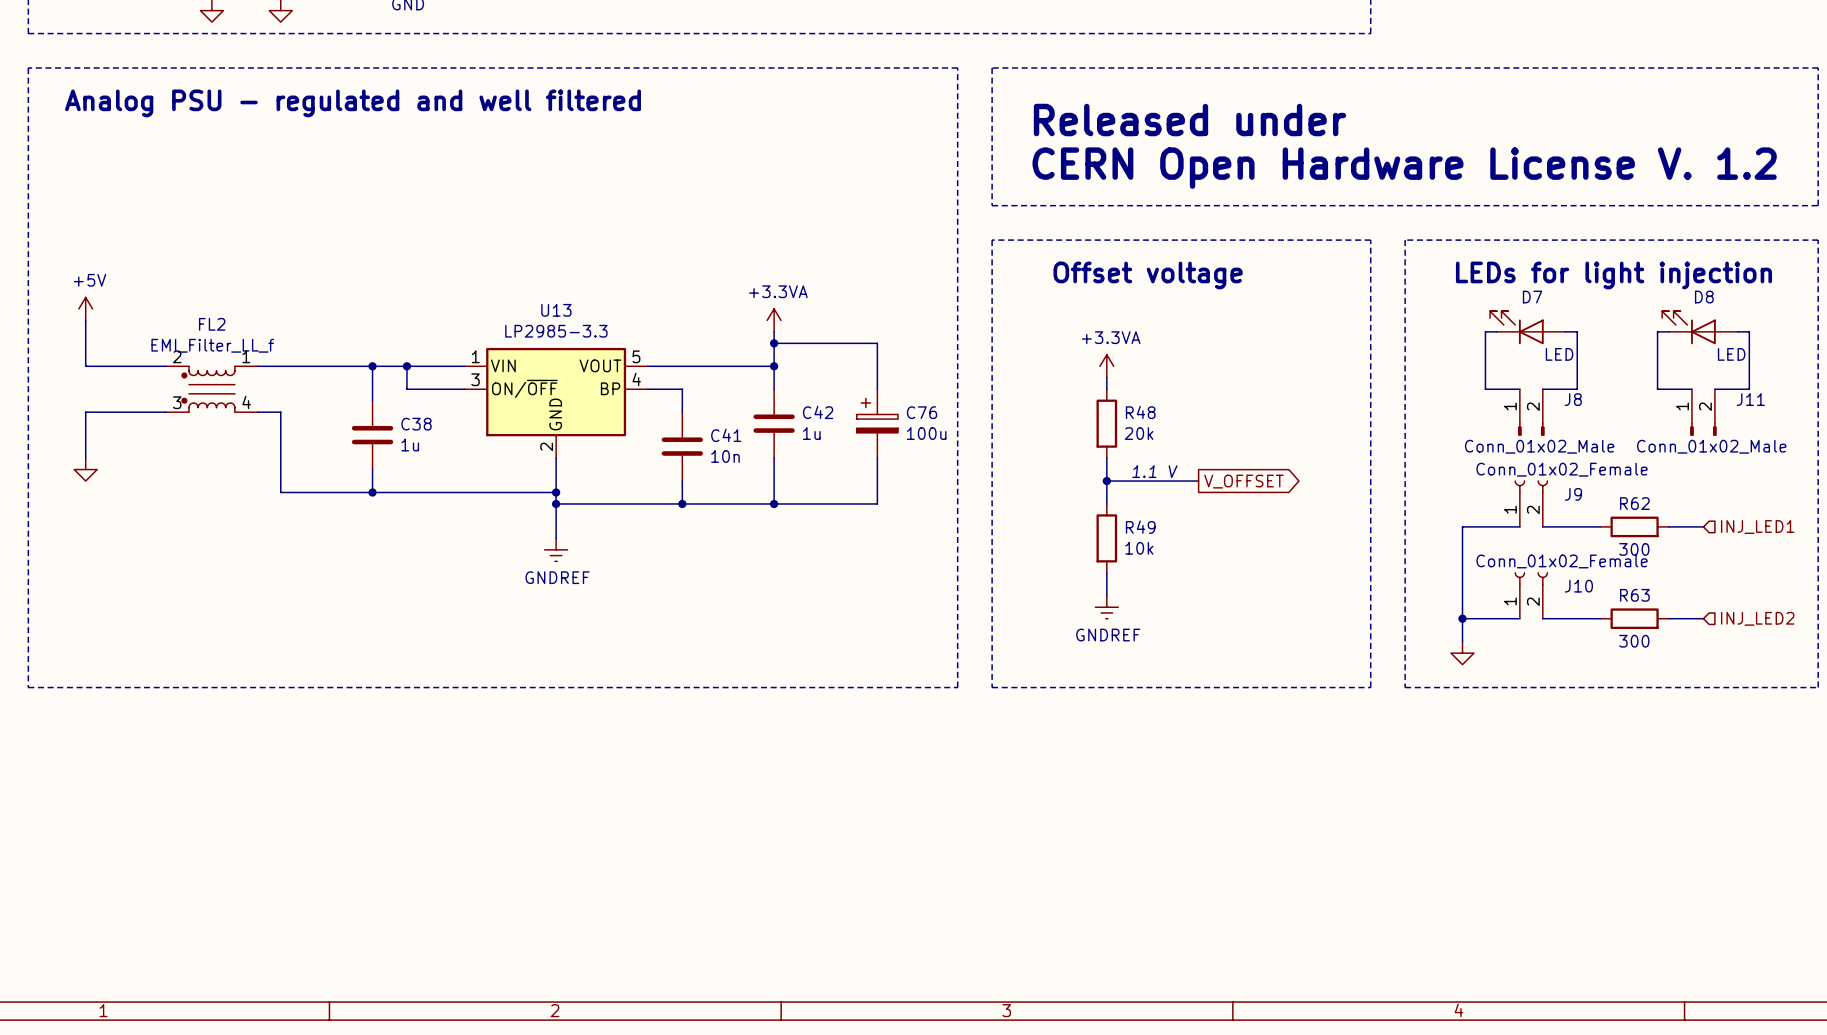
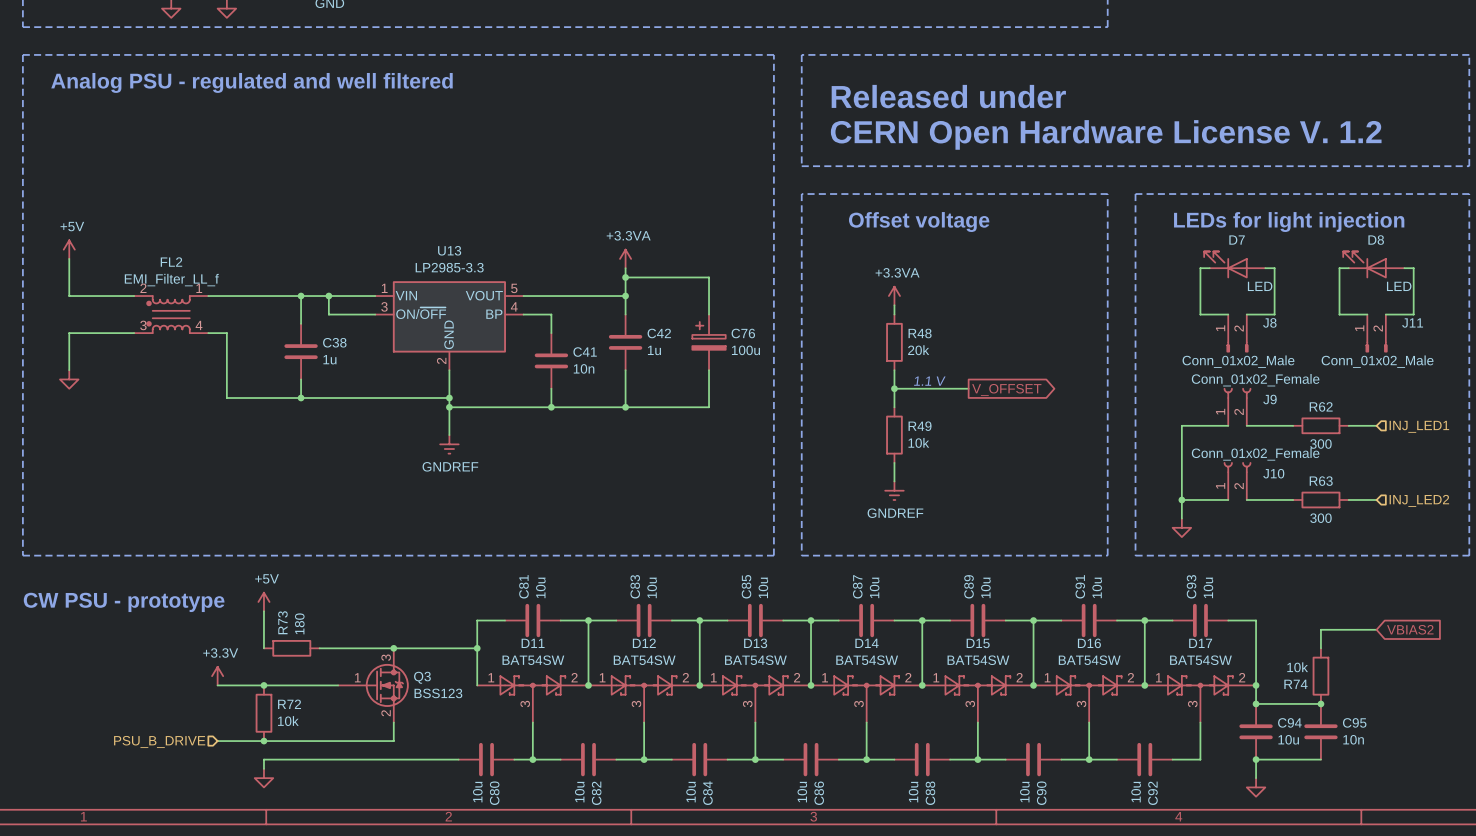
power symbol: none -> +5V (263, 601)
text: none -> CW PSU - prototype (124, 602)
wire: none -> (263, 611) (263, 648)
wire: none -> (505, 620) (477, 620) (477, 685)
C81: none -> 10u (532, 620)
wire: none -> (560, 620) (616, 620)
wire: none -> (588, 620) (588, 685)
junction: none -> (588, 620)
C83: none -> 10u (644, 620)
wire: none -> (671, 620) (727, 620)
wire: none -> (699, 620) (699, 685)
junction: none -> (699, 620)
C85: none -> 10u (755, 620)
wire: none -> (783, 620) (838, 620)
wire: none -> (811, 620) (811, 685)
junction: none -> (811, 620)
C87: none -> 10u (866, 620)
wire: none -> (894, 620) (950, 620)
wire: none -> (922, 620) (922, 685)
junction: none -> (922, 620)
C89: none -> 10u (977, 620)
wire: none -> (1005, 620) (1061, 620)
wire: none -> (1033, 620) (1033, 685)
junction: none -> (1033, 620)
C91: none -> 10u (1089, 620)
wire: none -> (1116, 620) (1172, 620)
wire: none -> (1144, 620) (1144, 685)
junction: none -> (1144, 620)
C93: none -> 10u (1200, 620)
wire: none -> (1228, 620) (1256, 620) (1256, 703) (1320, 703)
wire: none -> (1376, 629) (1320, 629) (1320, 648)
global label: none -> VBIAS2 (1410, 629)
R73: none -> 180 (291, 648)
wire: none -> (319, 648) (477, 648)
junction: none -> (393, 648)
junction: none -> (477, 648)
power symbol: none -> +3.3V (217, 676)
R74: none -> 10k (1320, 676)
wire: none -> (217, 685) (338, 685)
junction: none -> (263, 685)
Q3: none -> BSS123 (373, 685)
junction: none -> (588, 685)
junction: none -> (699, 685)
junction: none -> (811, 685)
junction: none -> (922, 685)
junction: none -> (1033, 685)
junction: none -> (1144, 685)
junction: none -> (1256, 685)
D11: none -> BAT54SW (532, 699)
D12: none -> BAT54SW (644, 699)
D13: none -> BAT54SW (755, 699)
D14: none -> BAT54SW (866, 699)
D15: none -> BAT54SW (977, 699)
D16: none -> BAT54SW (1089, 699)
D17: none -> BAT54SW (1200, 699)
junction: none -> (1256, 703)
junction: none -> (1320, 703)
R72: none -> 10k (263, 713)
wire: none -> (393, 722) (393, 741) (217, 741)
wire: none -> (532, 722) (532, 759)
wire: none -> (644, 722) (644, 759)
wire: none -> (755, 722) (755, 759)
wire: none -> (866, 722) (866, 759)
wire: none -> (977, 722) (977, 759)
wire: none -> (1089, 722) (1089, 759)
wire: none -> (1200, 722) (1200, 759) (1172, 759)
C94: none -> 10u (1256, 731)
C95: none -> 10n (1320, 731)
hierarchical label: none -> PSU_B_DRIVE (159, 741)
junction: none -> (263, 741)
wire: none -> (458, 759) (263, 759) (263, 768)
C80: none -> 10u (486, 759)
wire: none -> (514, 759) (560, 759)
junction: none -> (532, 759)
C82: none -> 10u (588, 759)
wire: none -> (616, 759) (671, 759)
junction: none -> (644, 759)
C84: none -> 10u (699, 759)
wire: none -> (727, 759) (783, 759)
junction: none -> (755, 759)
C86: none -> 10u (811, 759)
wire: none -> (838, 759) (894, 759)
junction: none -> (866, 759)
C88: none -> 10u (922, 759)
wire: none -> (950, 759) (1005, 759)
junction: none -> (977, 759)
C90: none -> 10u (1033, 759)
wire: none -> (1061, 759) (1116, 759)
junction: none -> (1089, 759)
C92: none -> 10u (1144, 759)
junction: none -> (1256, 759)
wire: none -> (1320, 759) (1256, 759) (1256, 778)
power symbol: none -> (263, 778)
power symbol: none -> (1256, 787)

